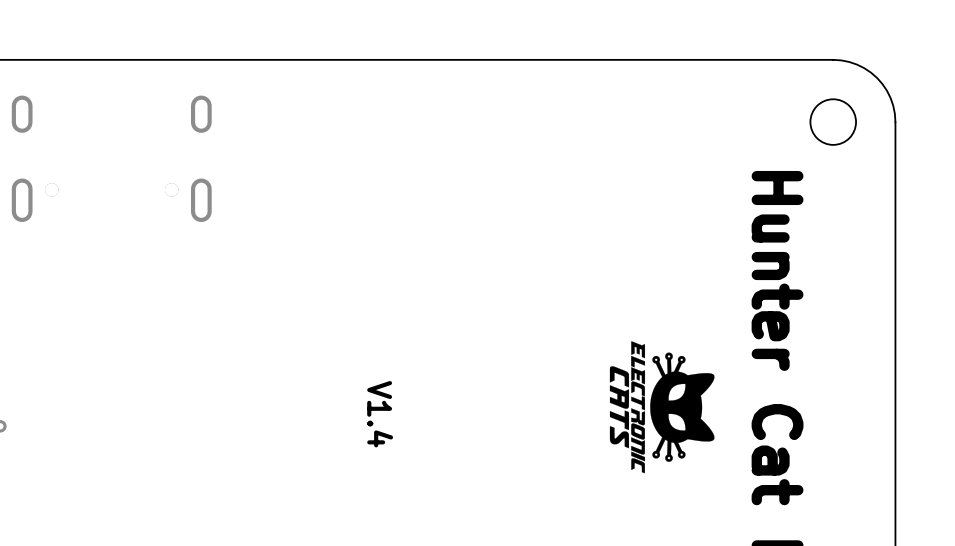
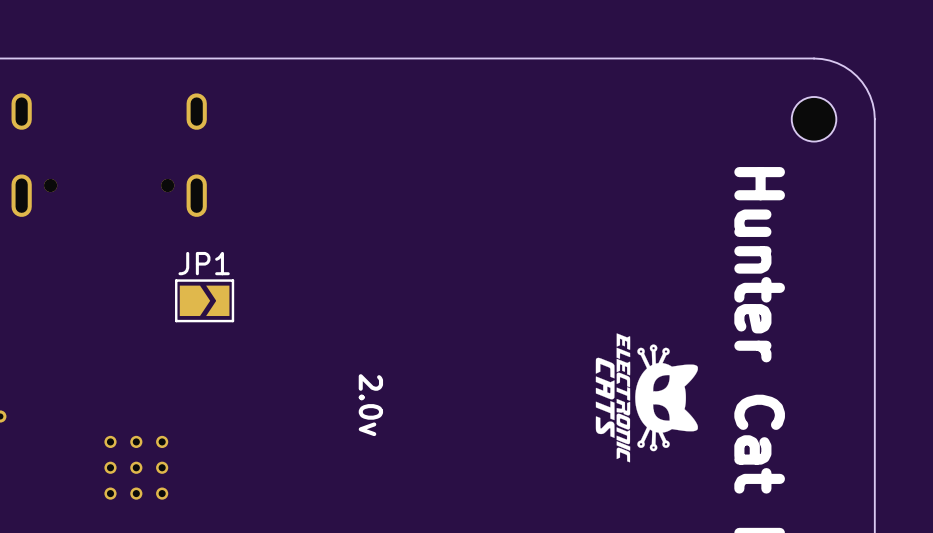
JP1: none -> (204, 300)
text: V1.4 (380, 414) -> 2.0v (370, 405)
part: none -> (136, 467)

